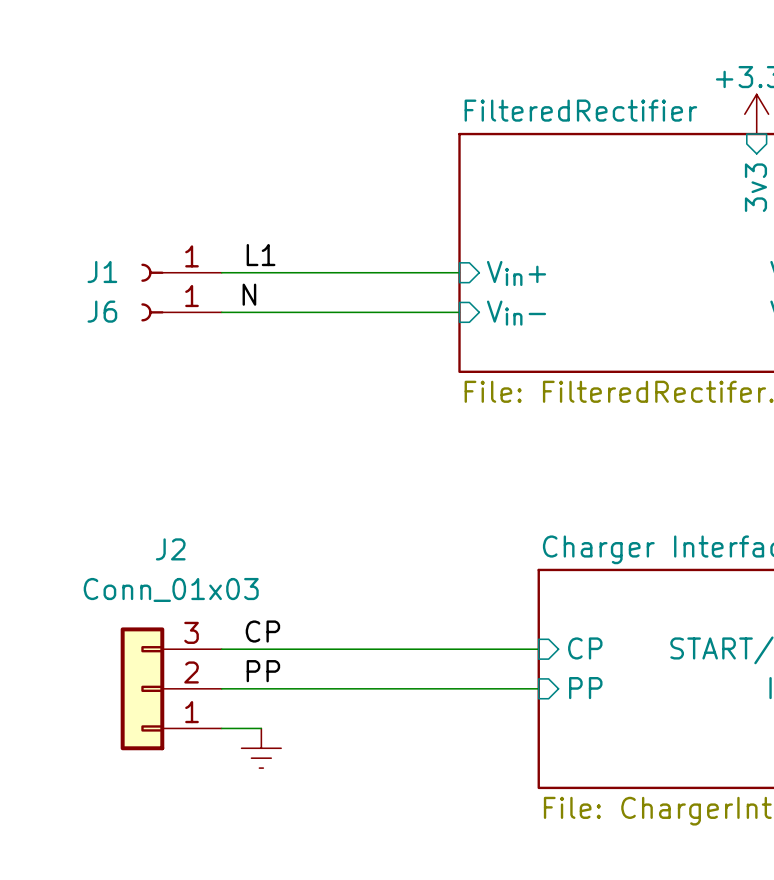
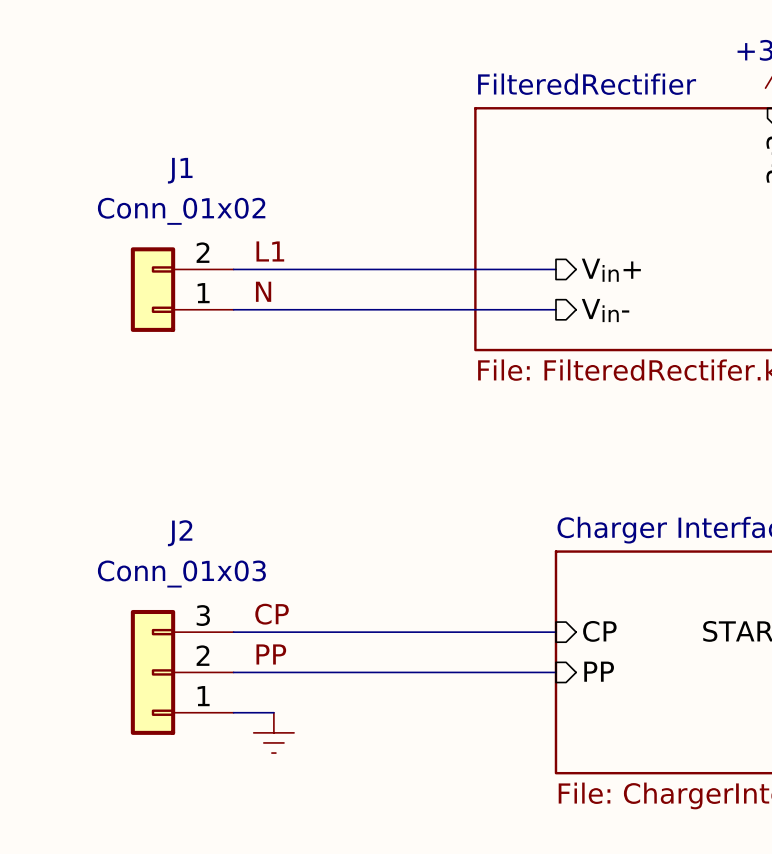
J1 value: none -> Conn_01x02 (181, 211)
label position: L1 (261, 255) -> L1 (270, 251)
J1 symbol: [141, 263, 222, 282] -> [130, 247, 234, 332]
J1 name position: J1 (102, 272) -> J1 (180, 170)
wire: (221, 272) (459, 272) -> none
sheet pin position: Vin+ (516, 273) -> Vin+ (611, 270)
wire: none -> (233, 269) (555, 269)
label position: N (249, 294) -> N (263, 291)
J6: (181, 312) -> none
wire: (221, 312) (459, 312) -> none
sheet pin position: Vin- (516, 313) -> Vin- (605, 310)
wire: none -> (233, 309) (555, 309)

